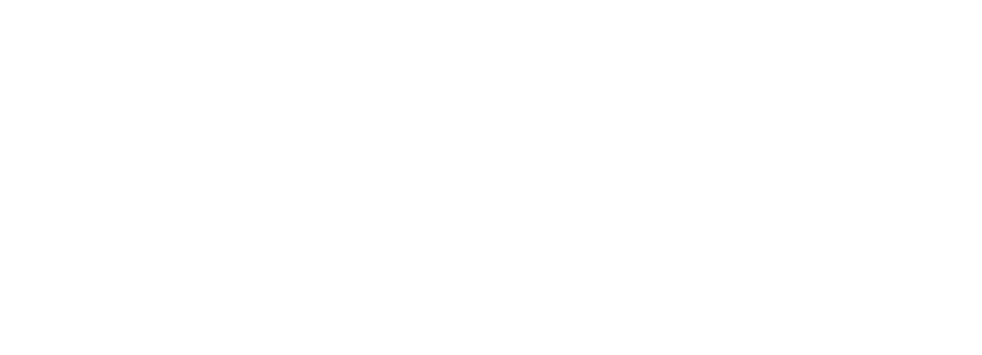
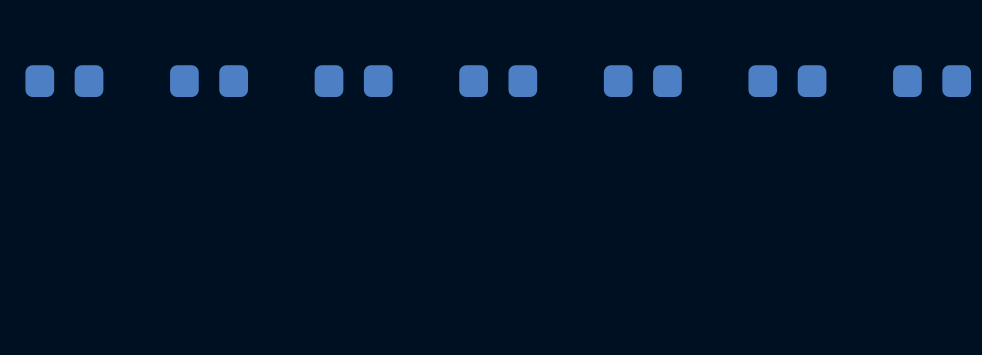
part: none -> (64, 81)
part: none -> (209, 81)
part: none -> (353, 81)
part: none -> (498, 81)
part: none -> (642, 81)
part: none -> (787, 81)
part: none -> (932, 81)

